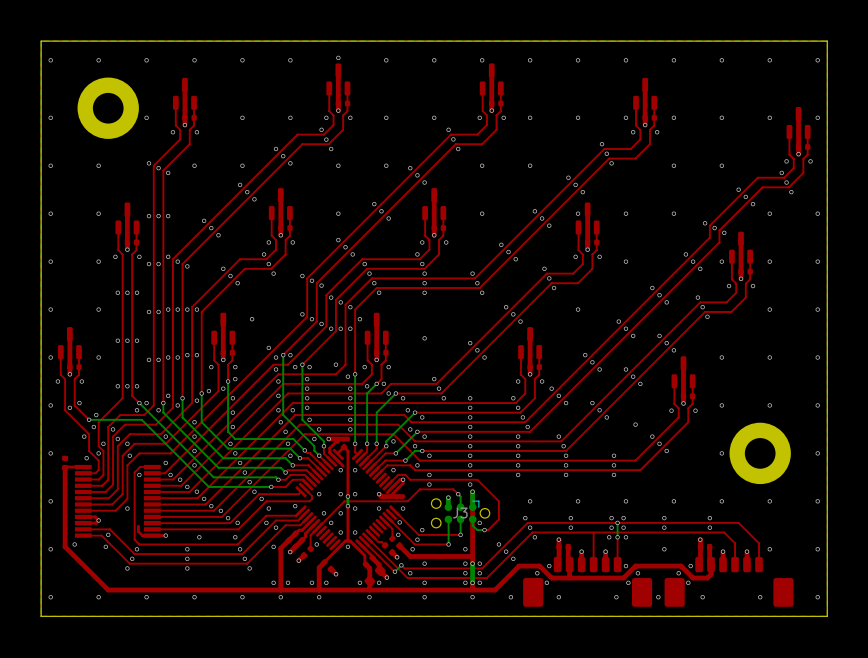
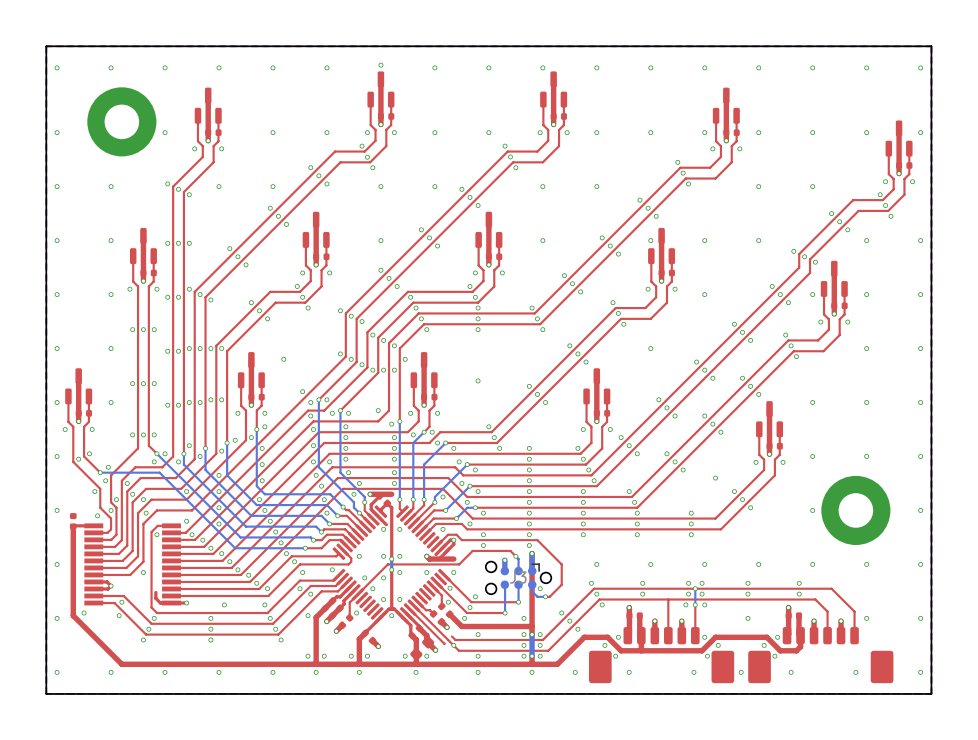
bottom track: (401, 565) (394, 571) -> none
via: (401, 565) -> none
via: (394, 571) -> none
via: none -> (453, 645)
via: (410, 573) -> none

